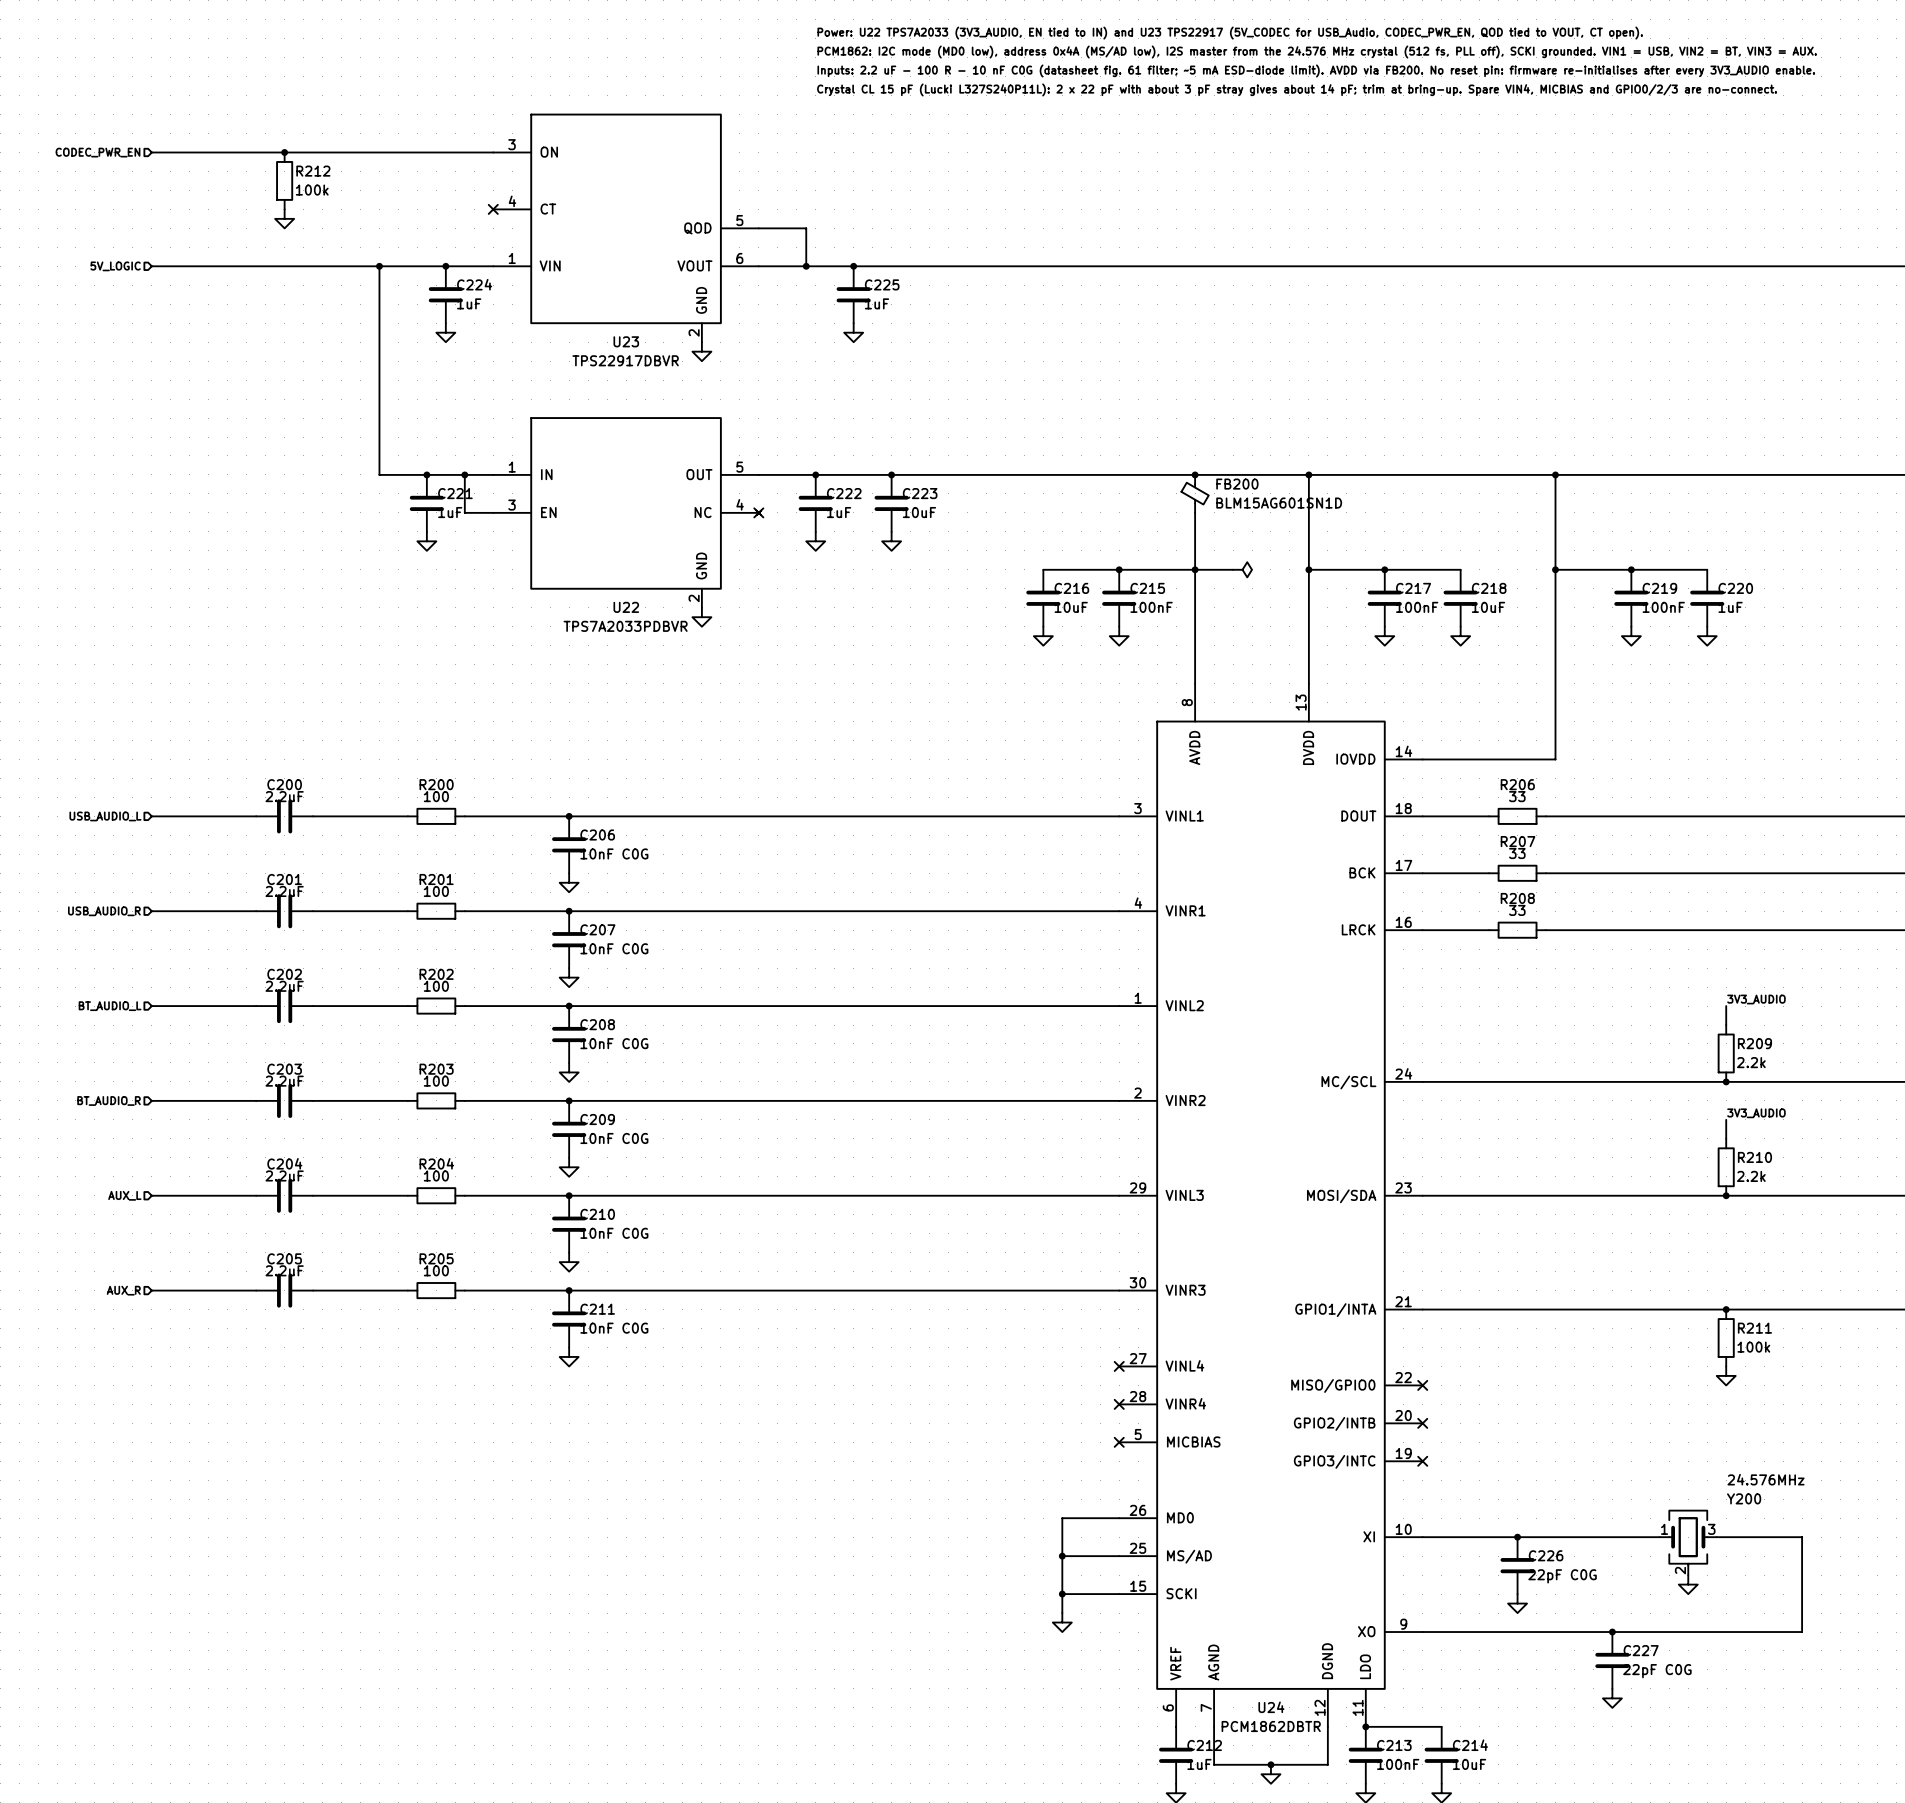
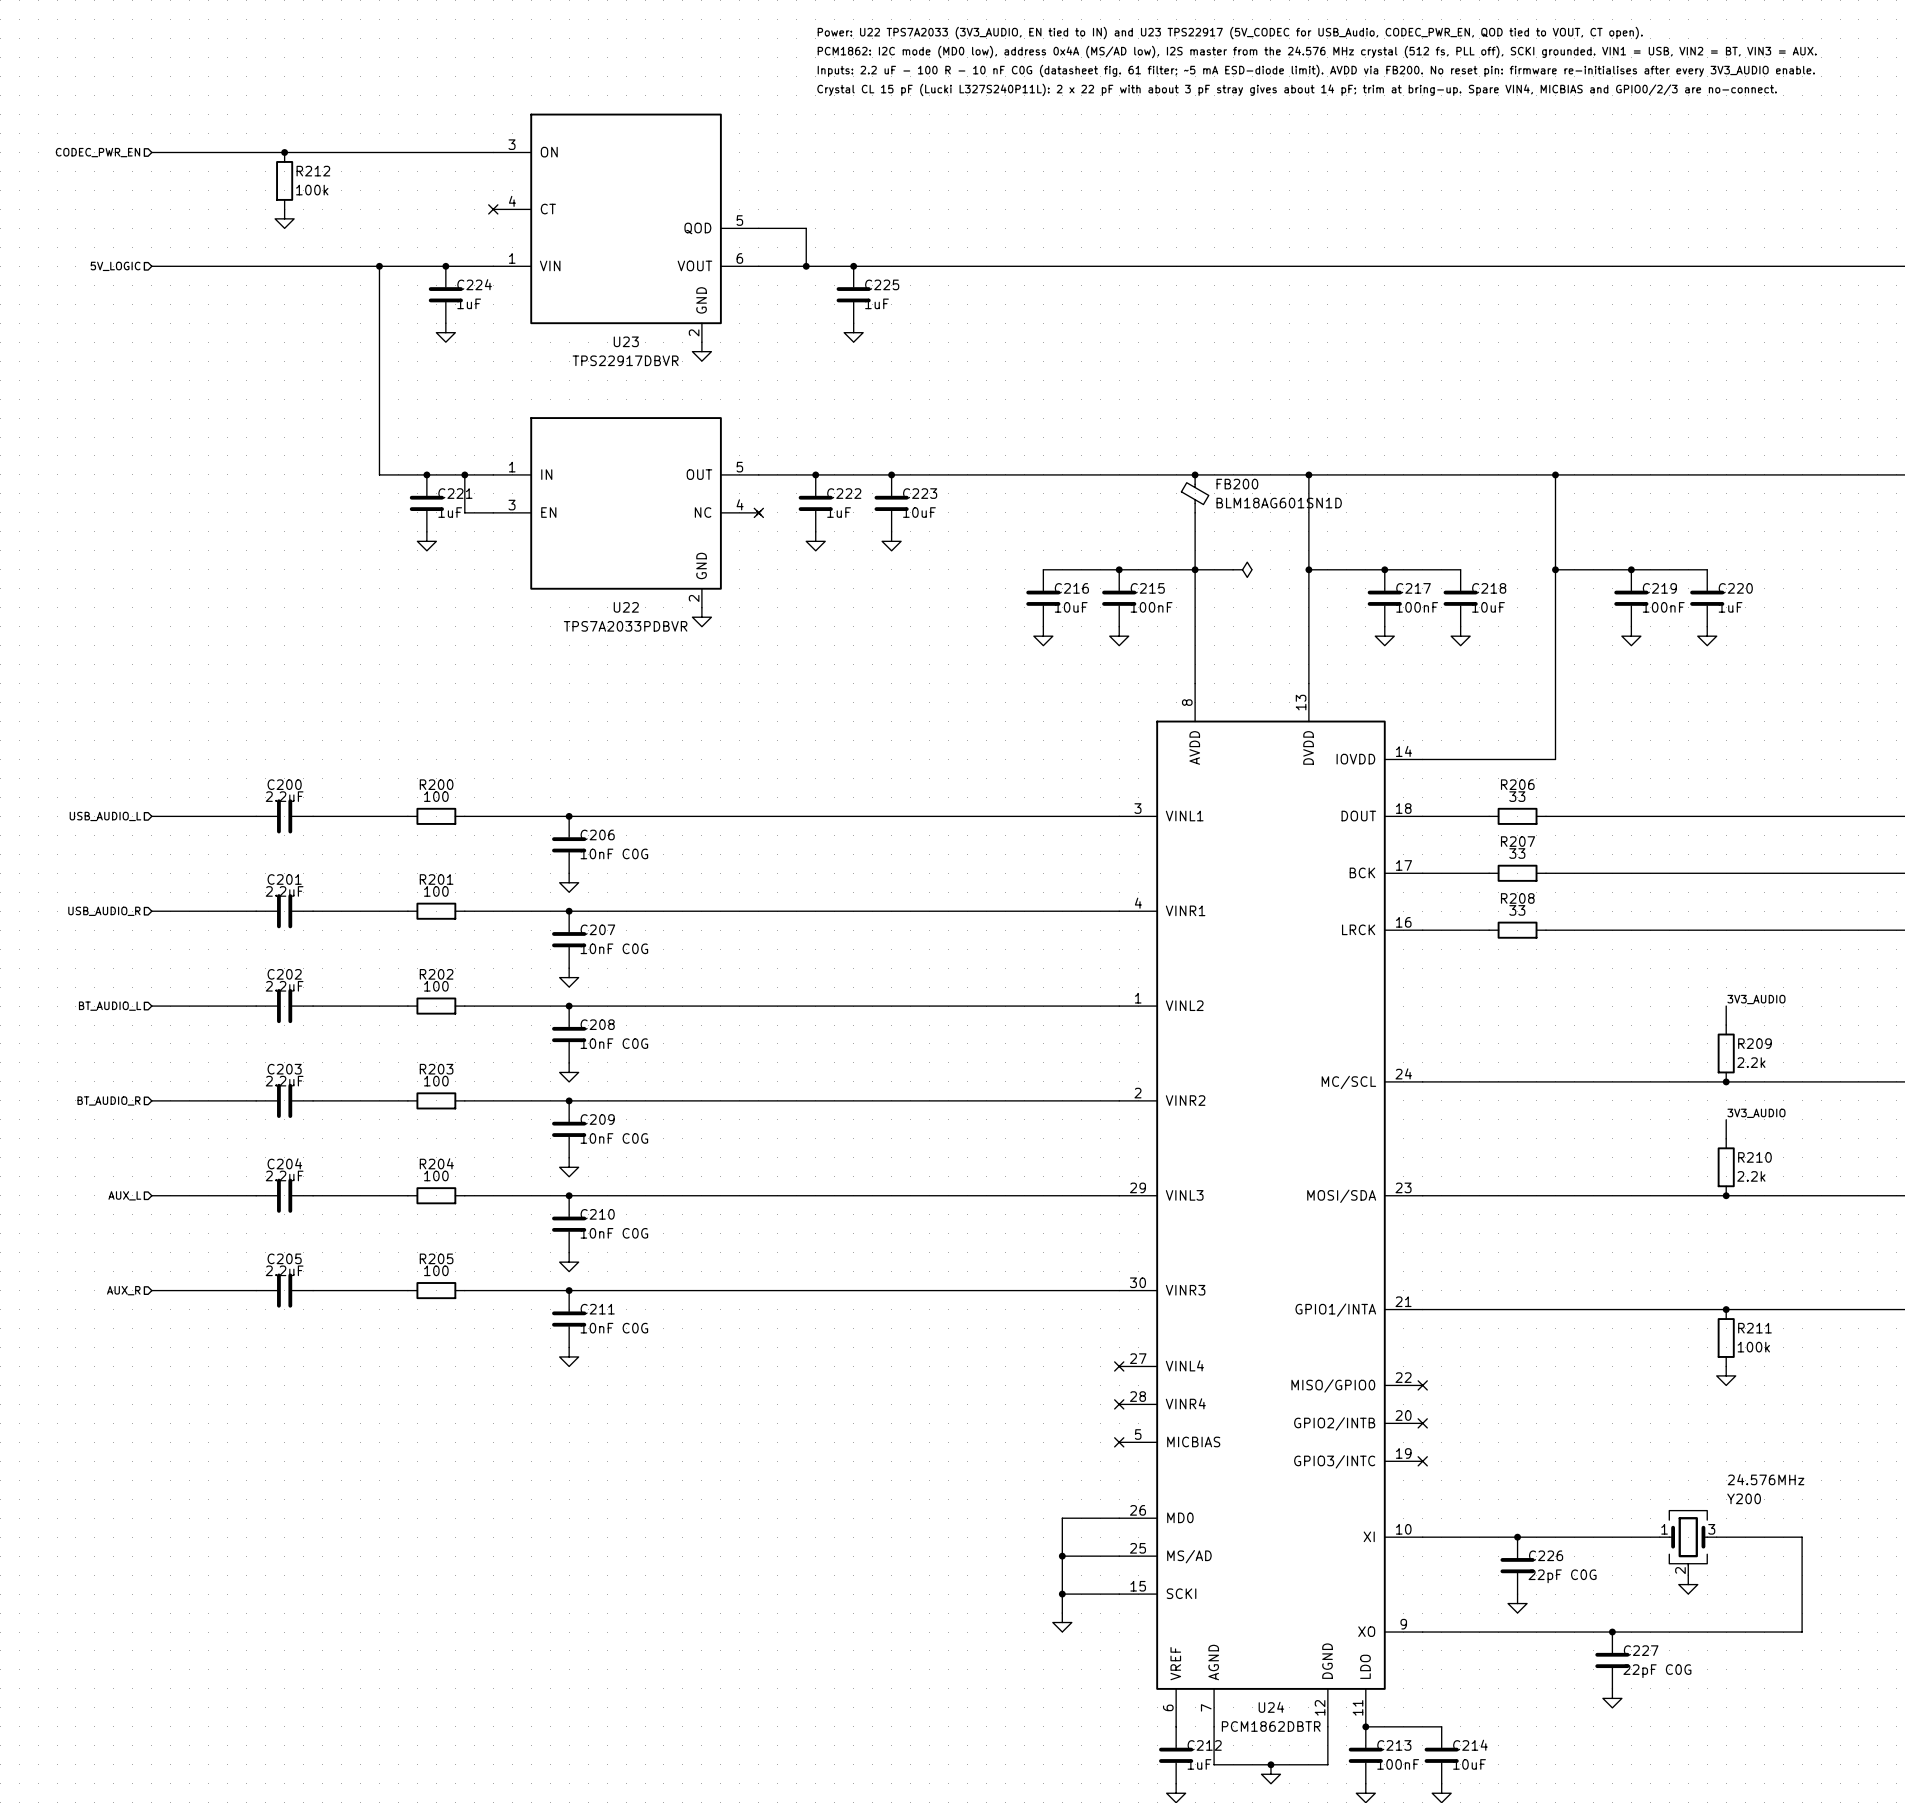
FB200 value: BLM15AG601SN1D (1279, 503) -> BLM18AG601SN1D (1279, 503)

